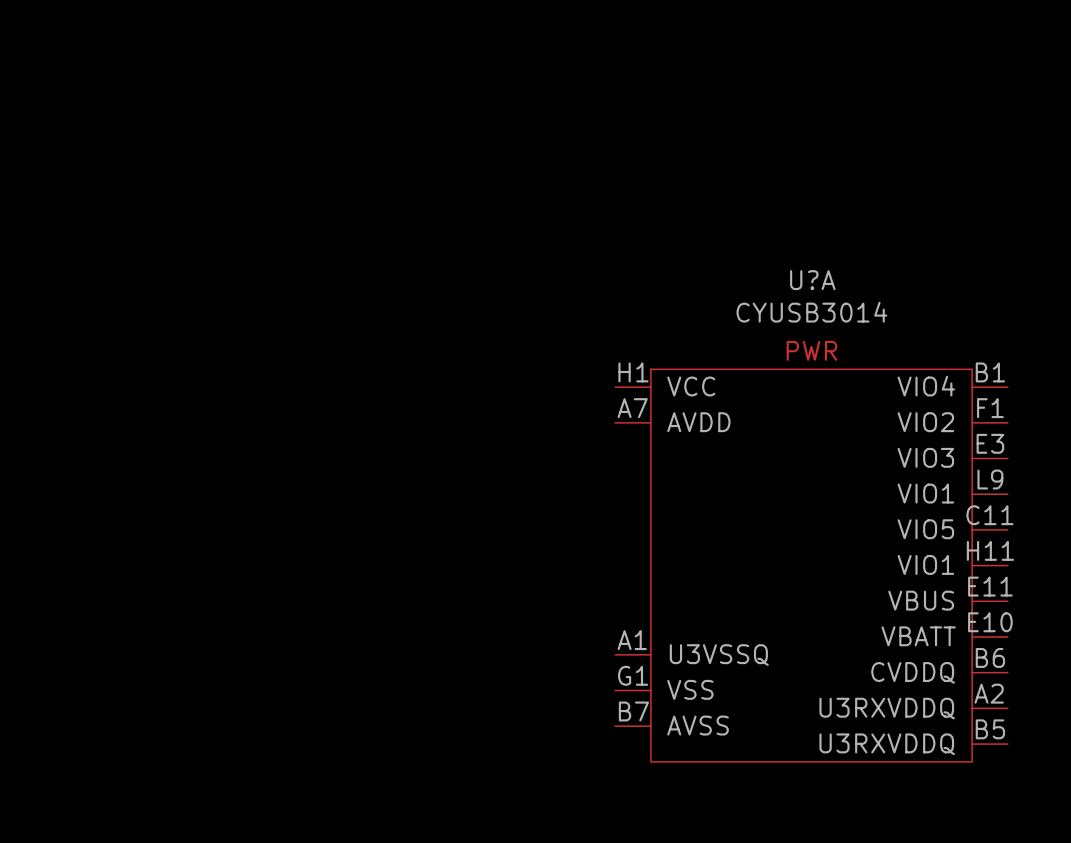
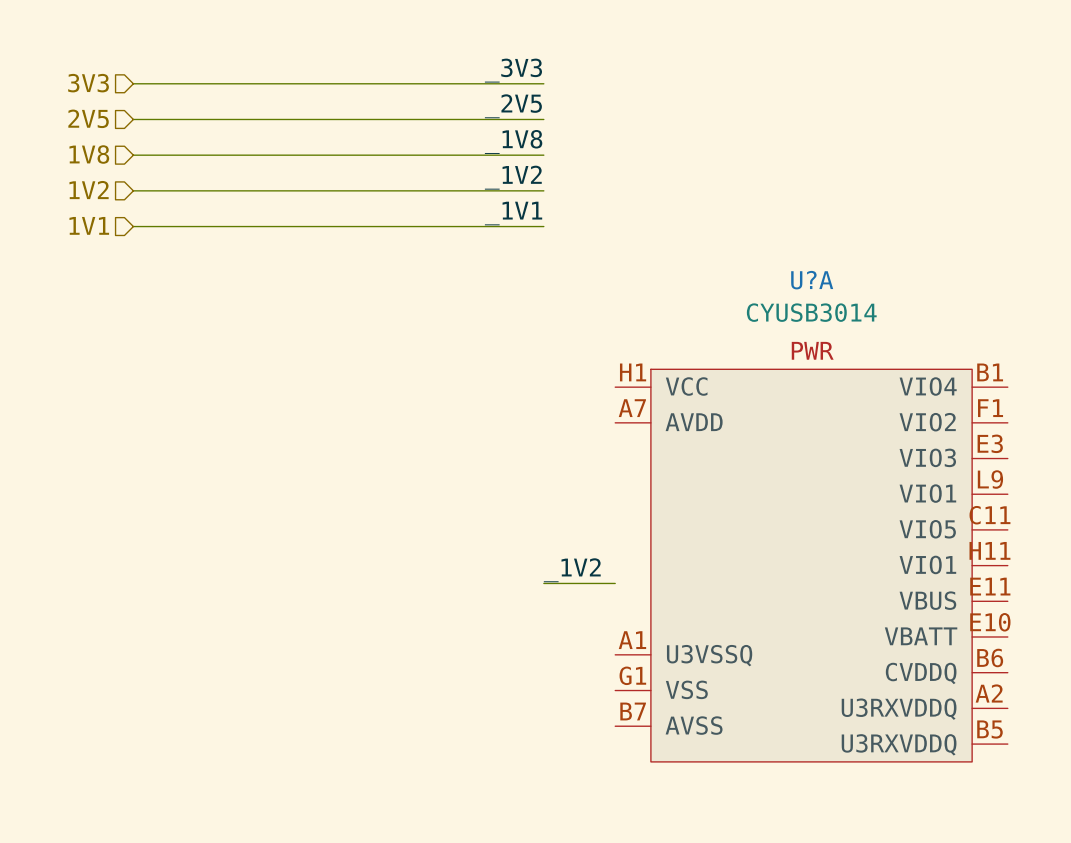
label: none -> _3V3 (513, 70)
hierarchical label: none -> 3V3 (88, 83)
wire: none -> (133, 83) (543, 83)
label: none -> _2V5 (513, 106)
hierarchical label: none -> 2V5 (88, 118)
wire: none -> (133, 119) (543, 119)
label: none -> _1V8 (513, 141)
hierarchical label: none -> 1V8 (89, 154)
wire: none -> (133, 155) (543, 155)
label: none -> _1V2 (513, 177)
hierarchical label: none -> 1V2 (89, 190)
wire: none -> (133, 190) (543, 190)
label: none -> _1V1 (513, 213)
hierarchical label: none -> 1V1 (89, 225)
wire: none -> (133, 226) (543, 226)
label: none -> _1V2 (572, 570)
wire: none -> (543, 583) (615, 583)

